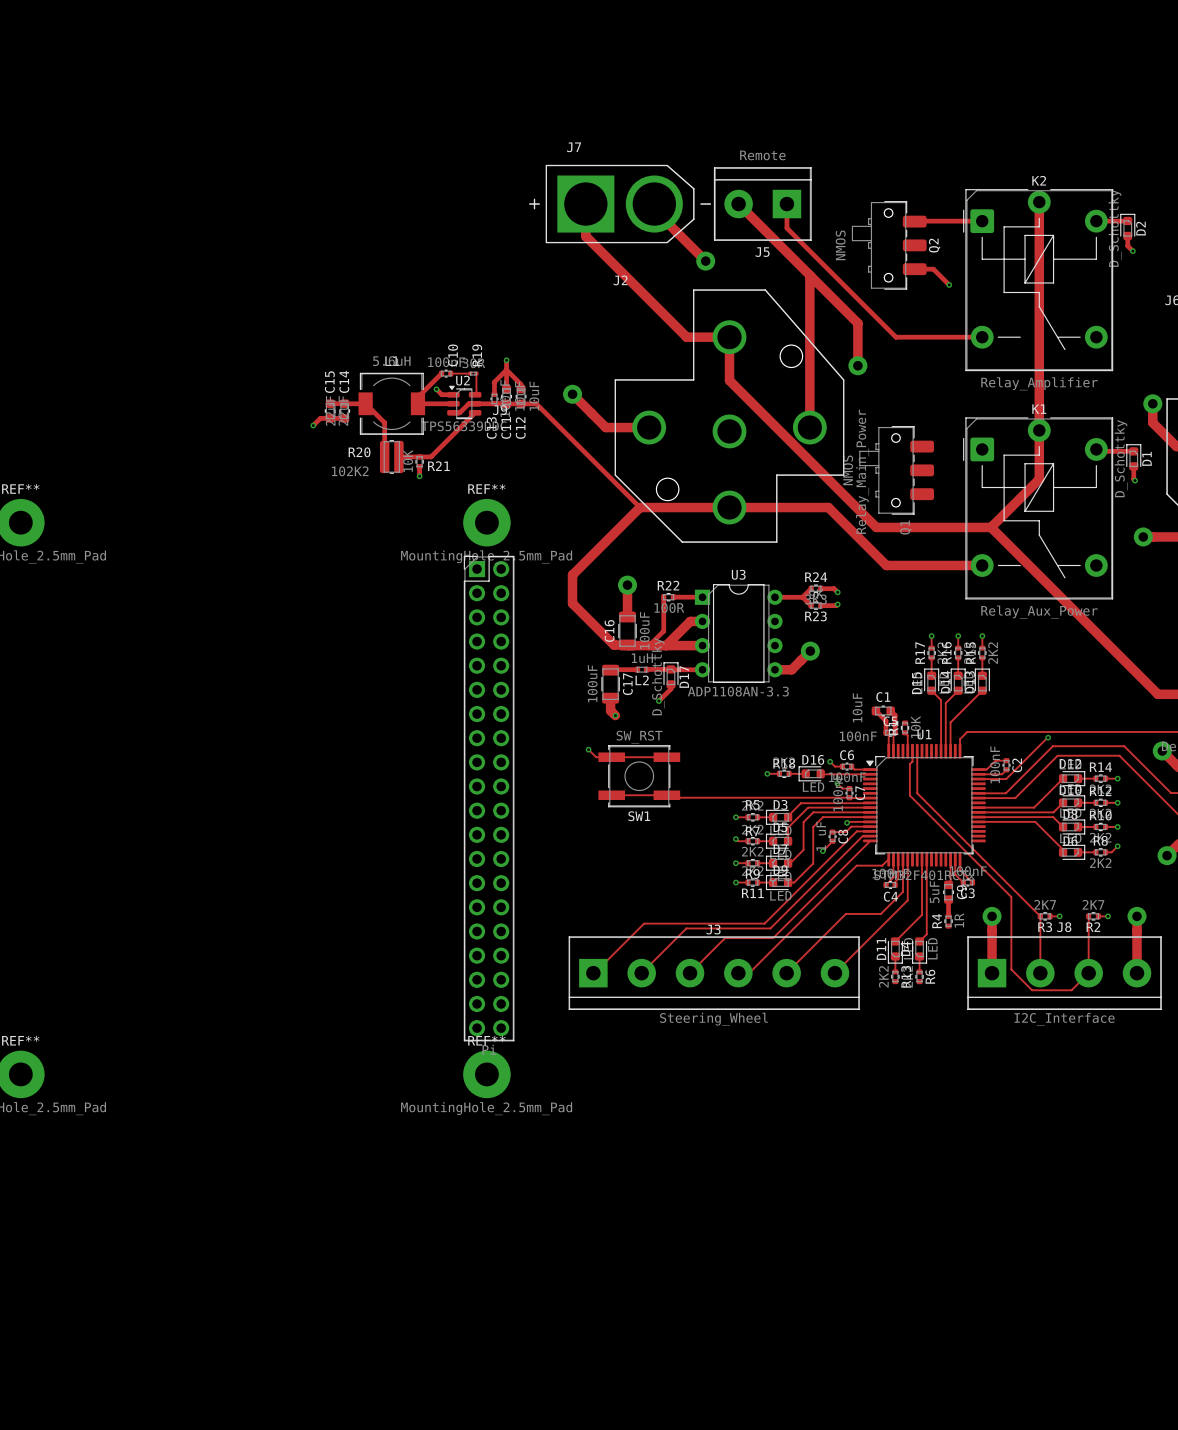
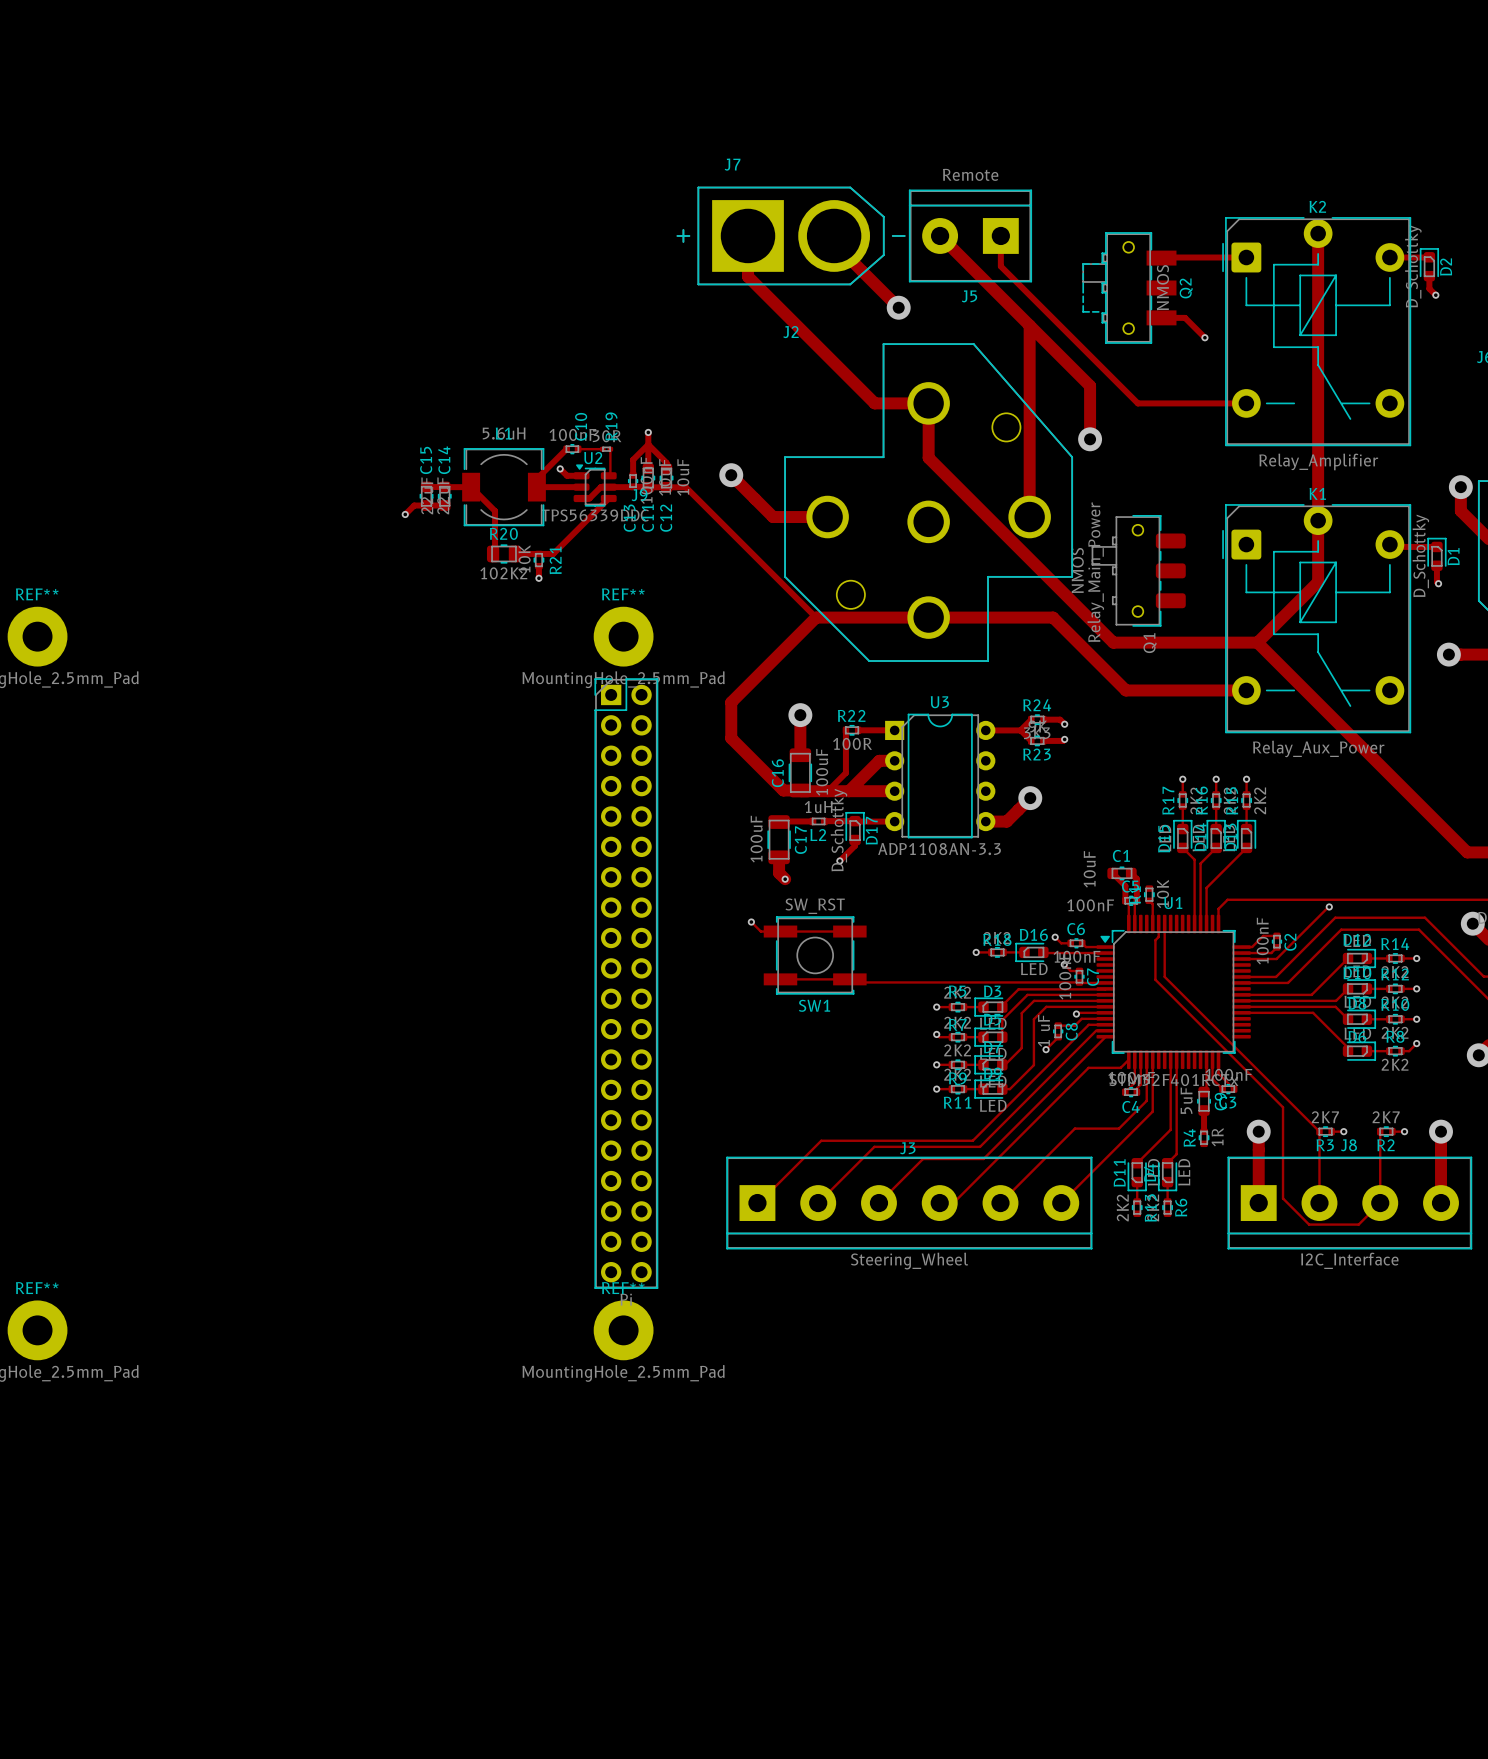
Q2 footprint: [851, 201, 927, 290] -> [1082, 232, 1177, 344]
Q2 value position: NMOS (840, 245) -> NMOS (1162, 287)
R20 footprint: [379, 440, 404, 474] -> [486, 544, 522, 564]
R20 name position: R20 (359, 452) -> R20 (503, 533)
R21 name rotation: 0° (438, 466) -> 90° counterclockwise (555, 560)
R20 value position: 102K2 (350, 471) -> 102K2 (503, 573)

